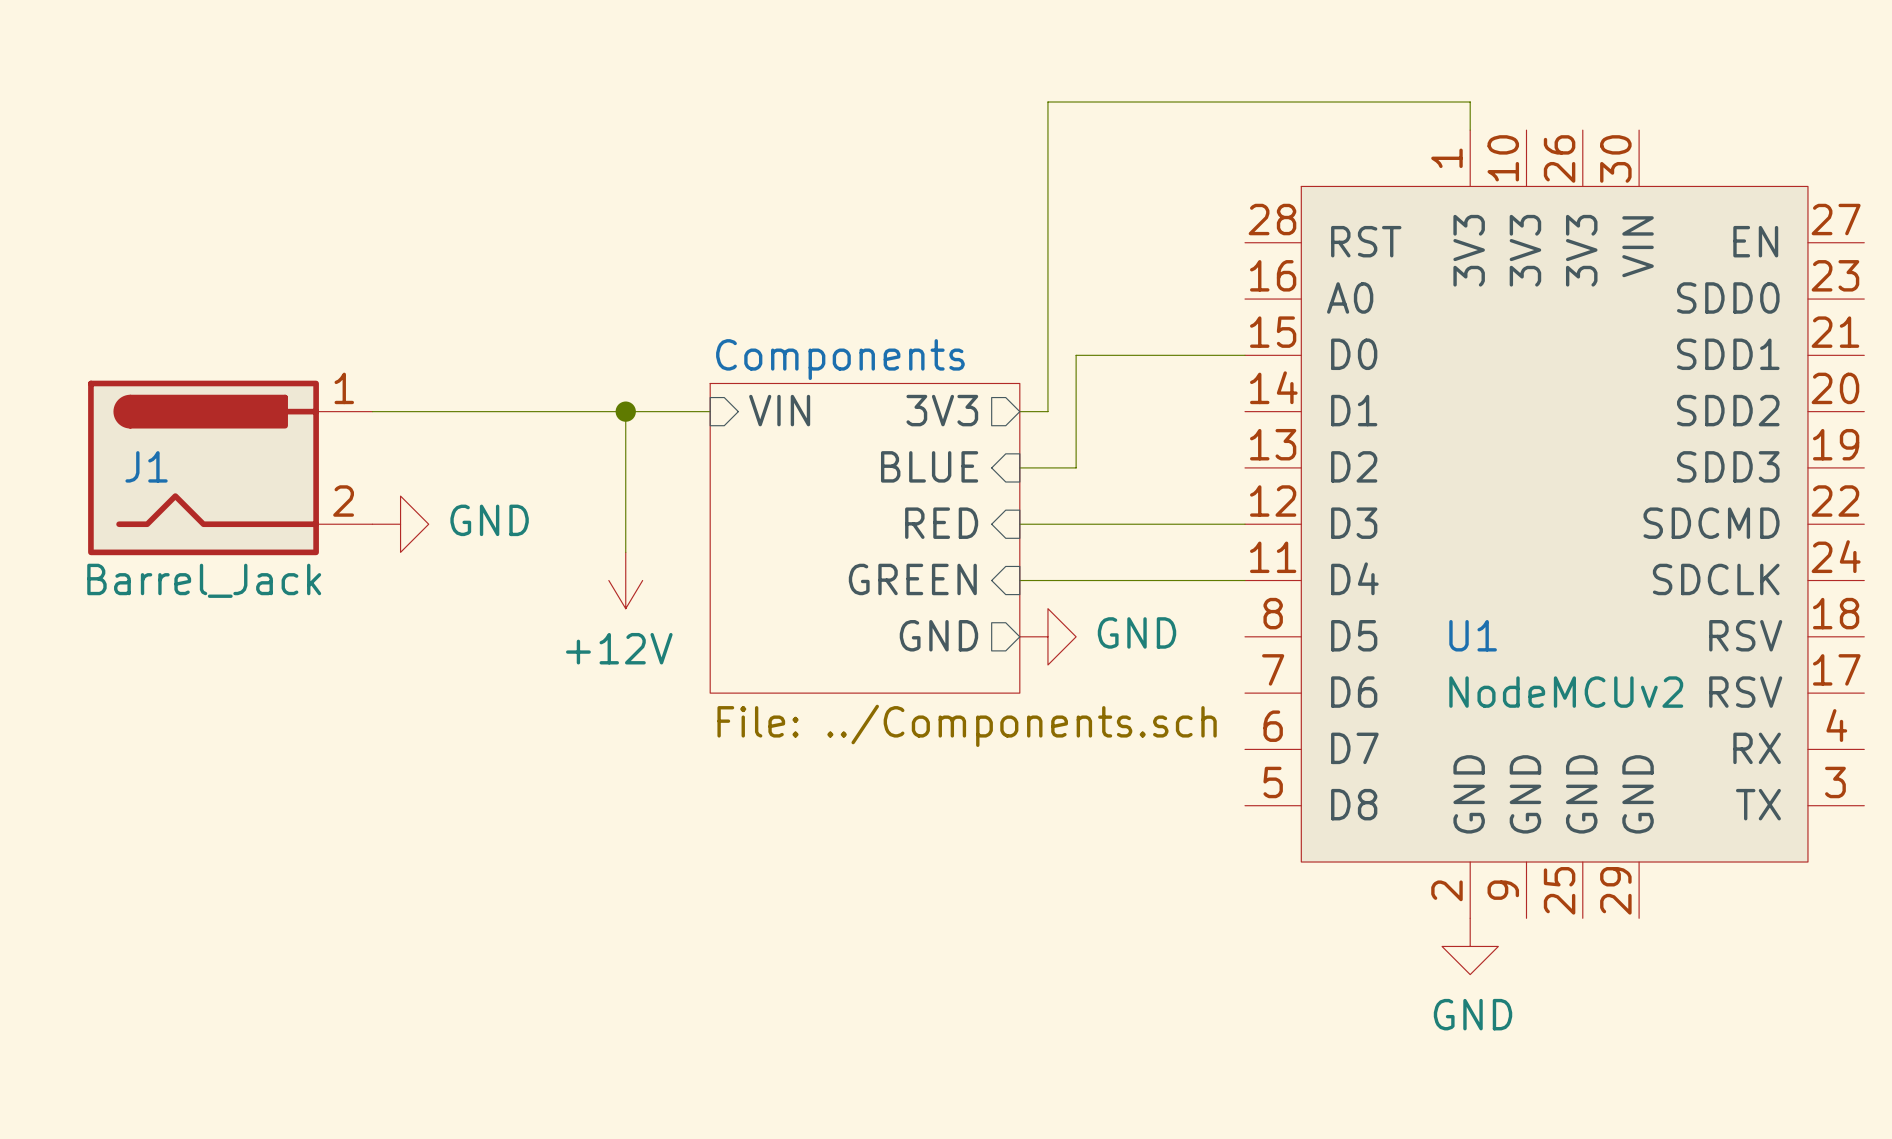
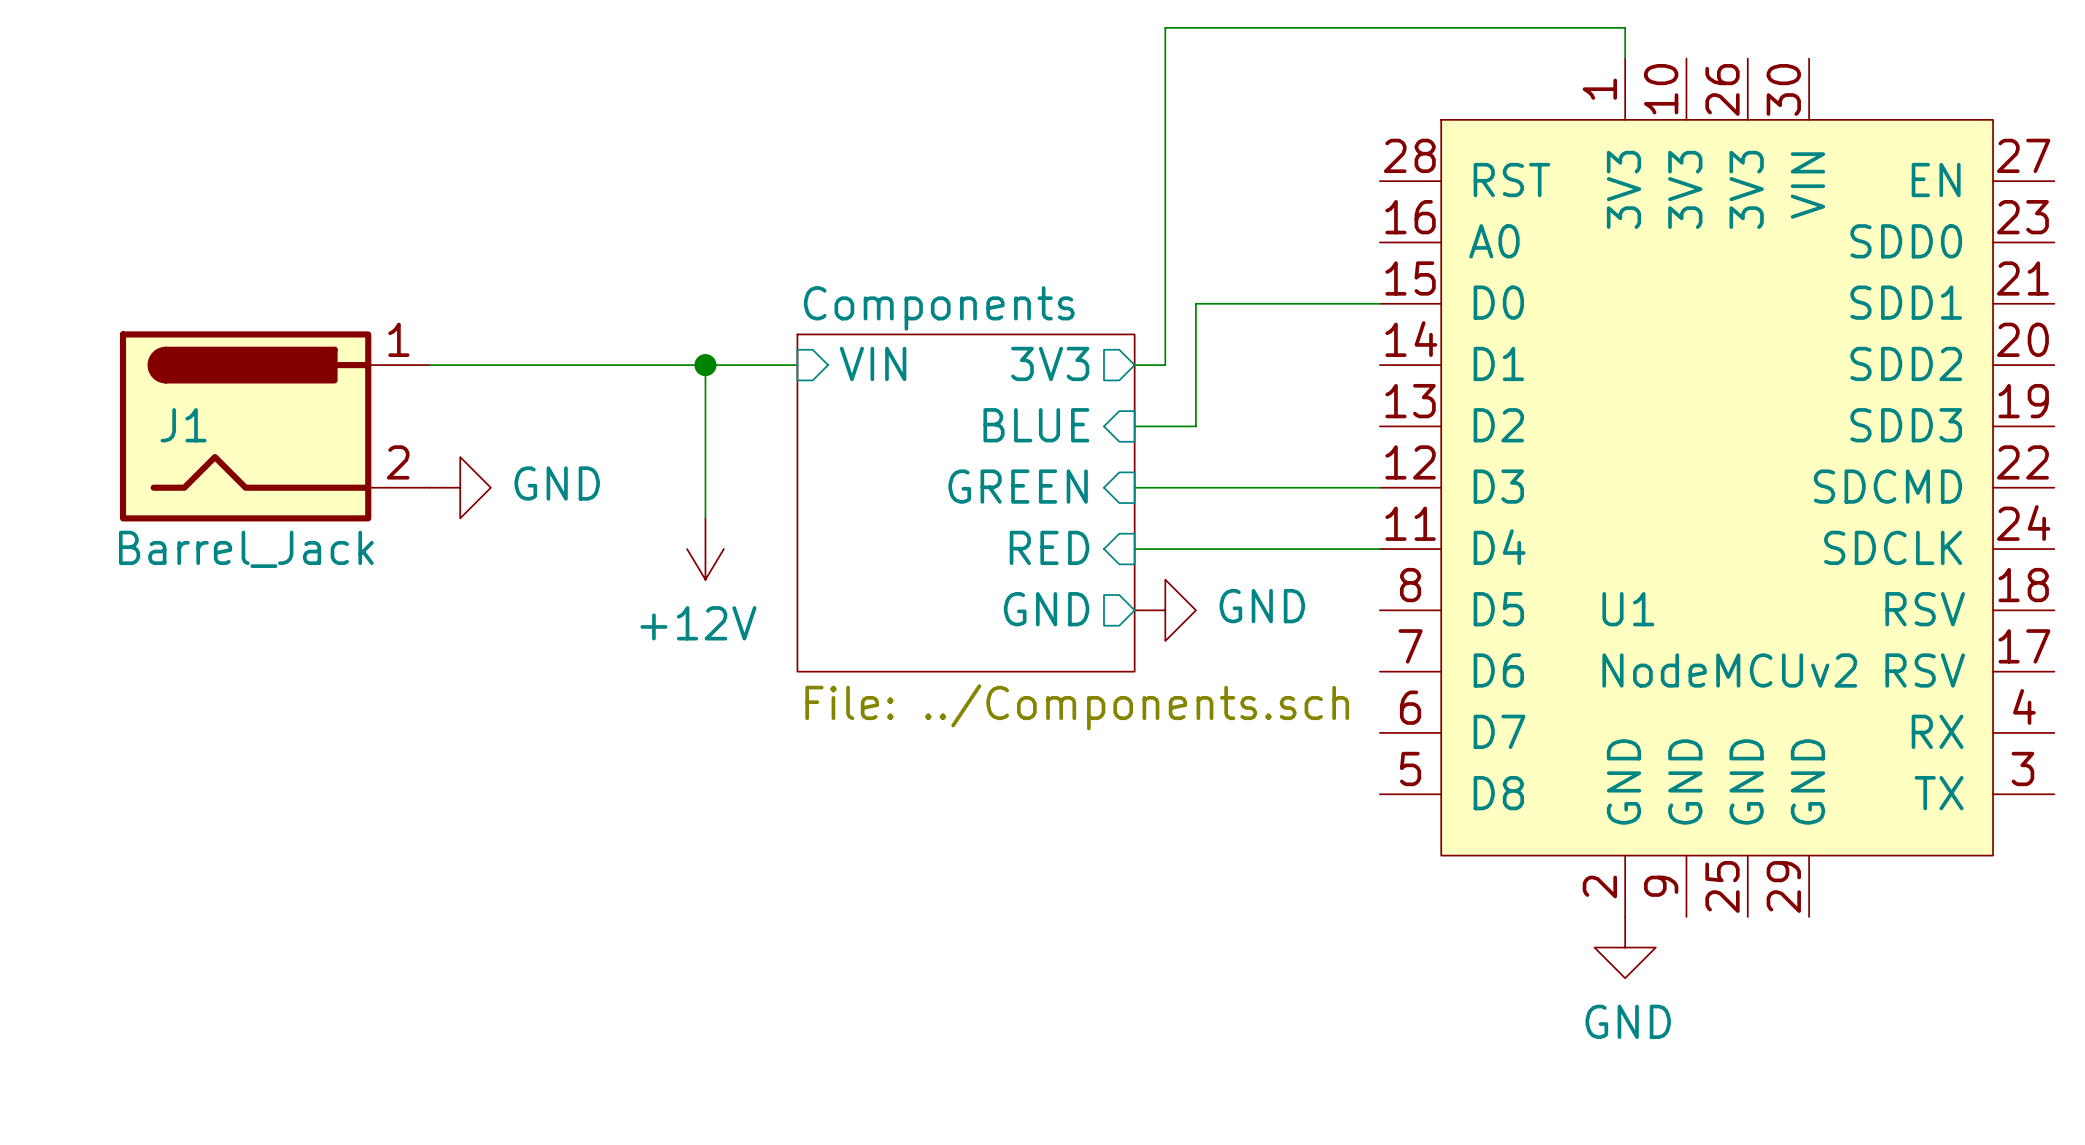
sheet pin: RED (941, 523) -> GREEN (1018, 486)
sheet pin: GREEN (912, 579) -> RED (1049, 547)

